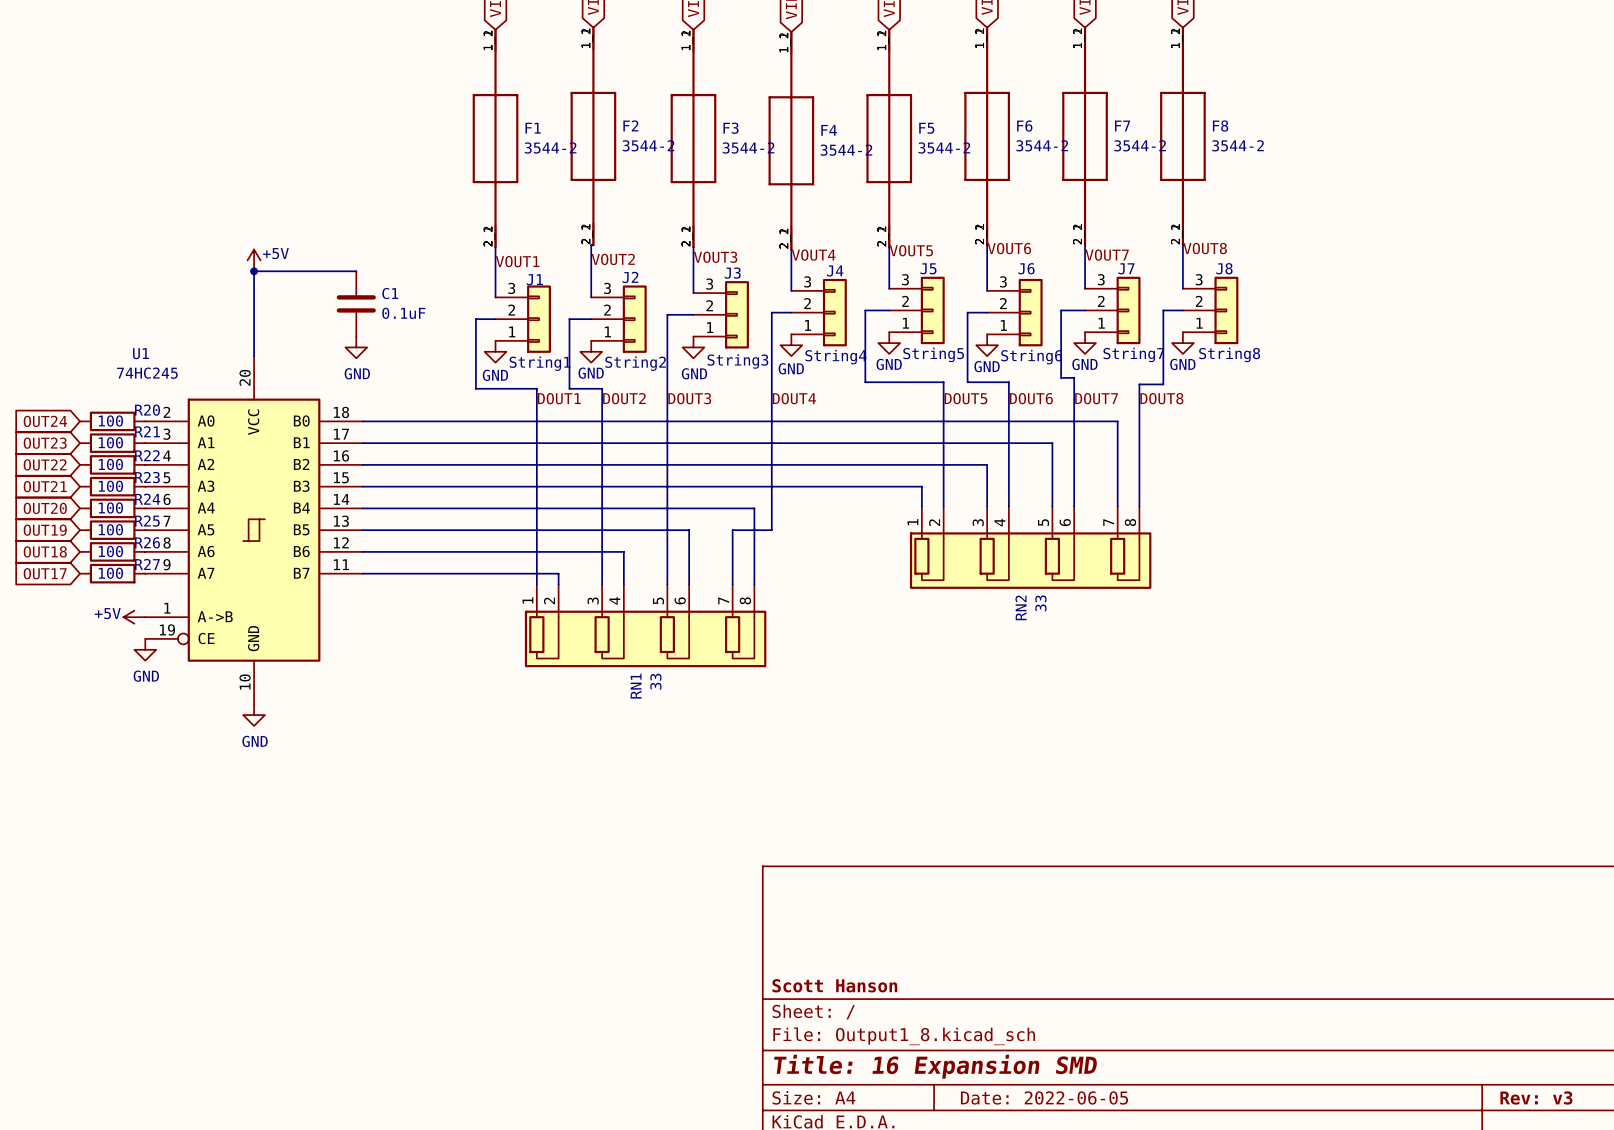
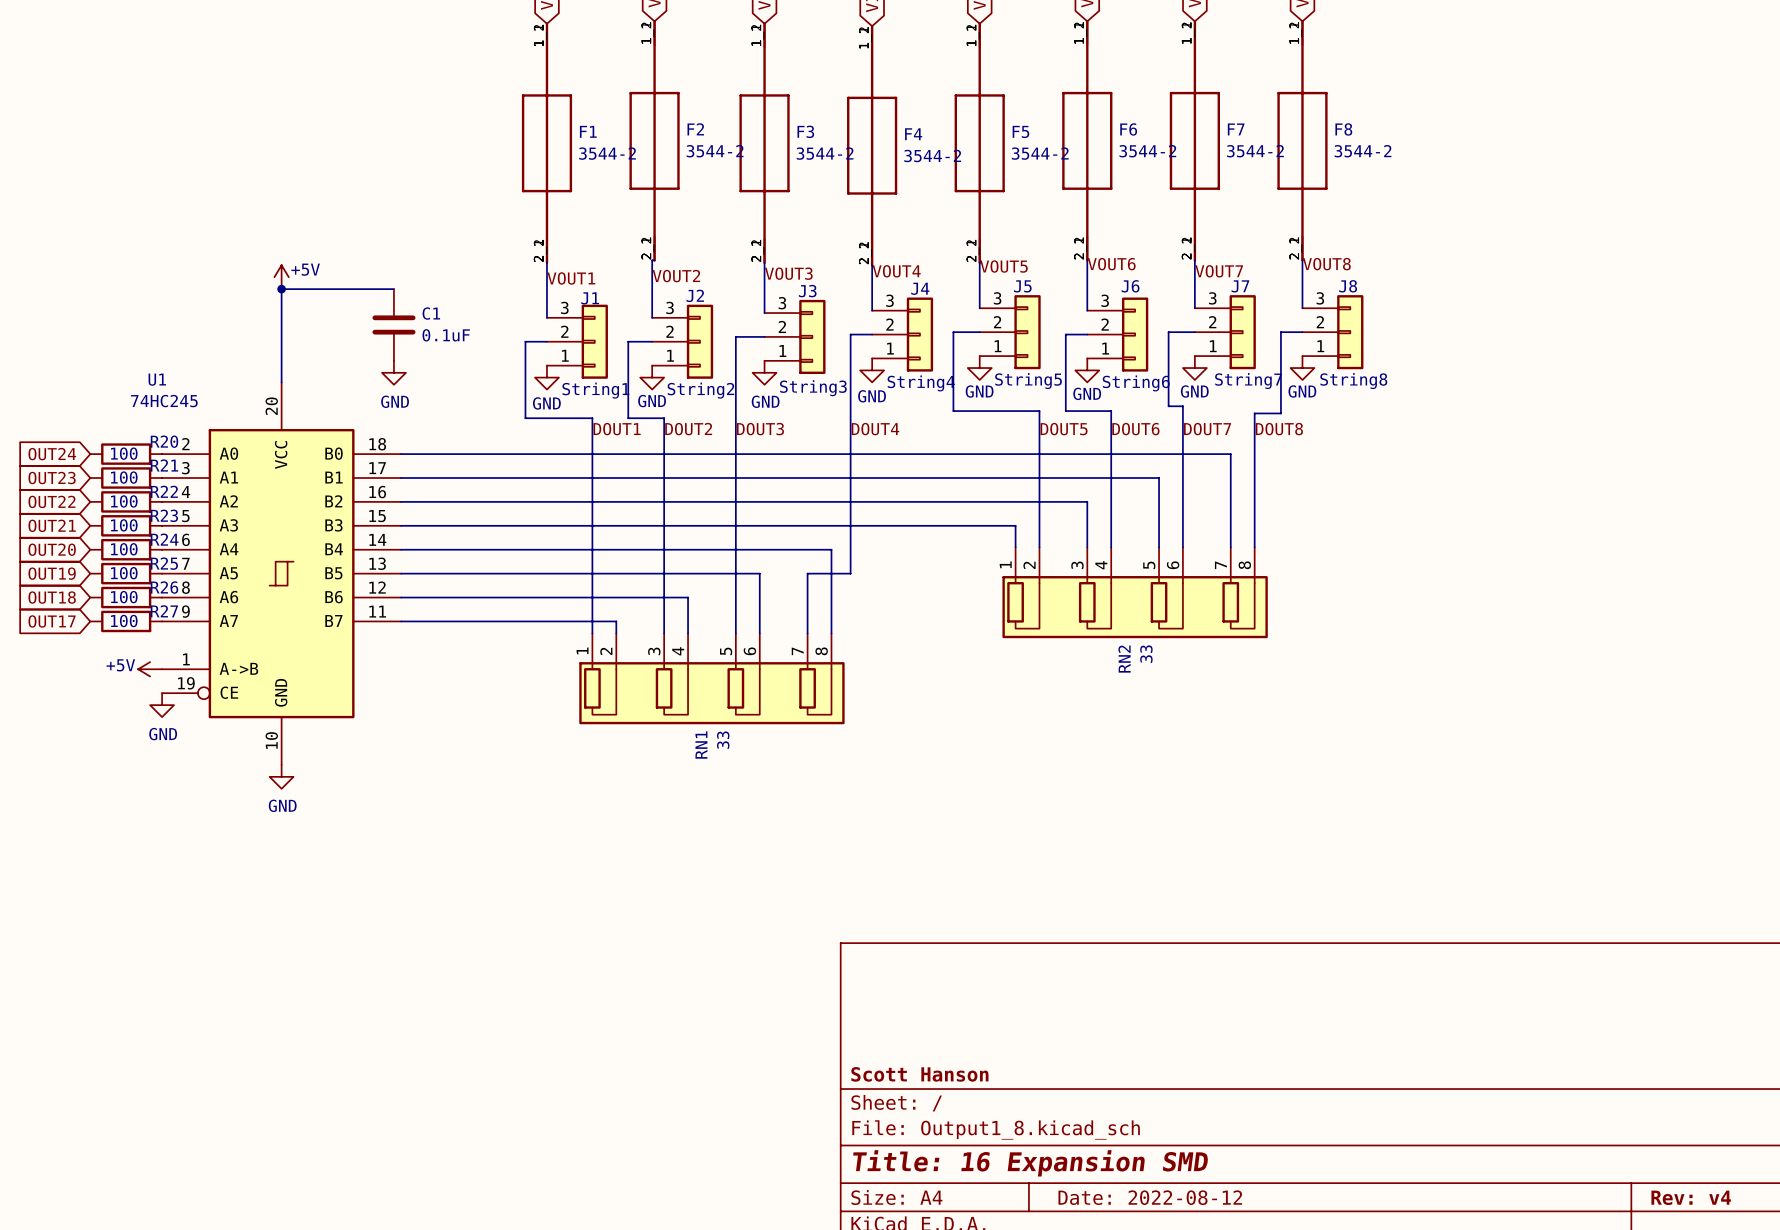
title block: Date: 2022-06-05 (1044, 1097) -> Date: 2022-08-12 (1150, 1197)
title block: Rev: v3 (1536, 1097) -> Rev: v4 (1691, 1197)

